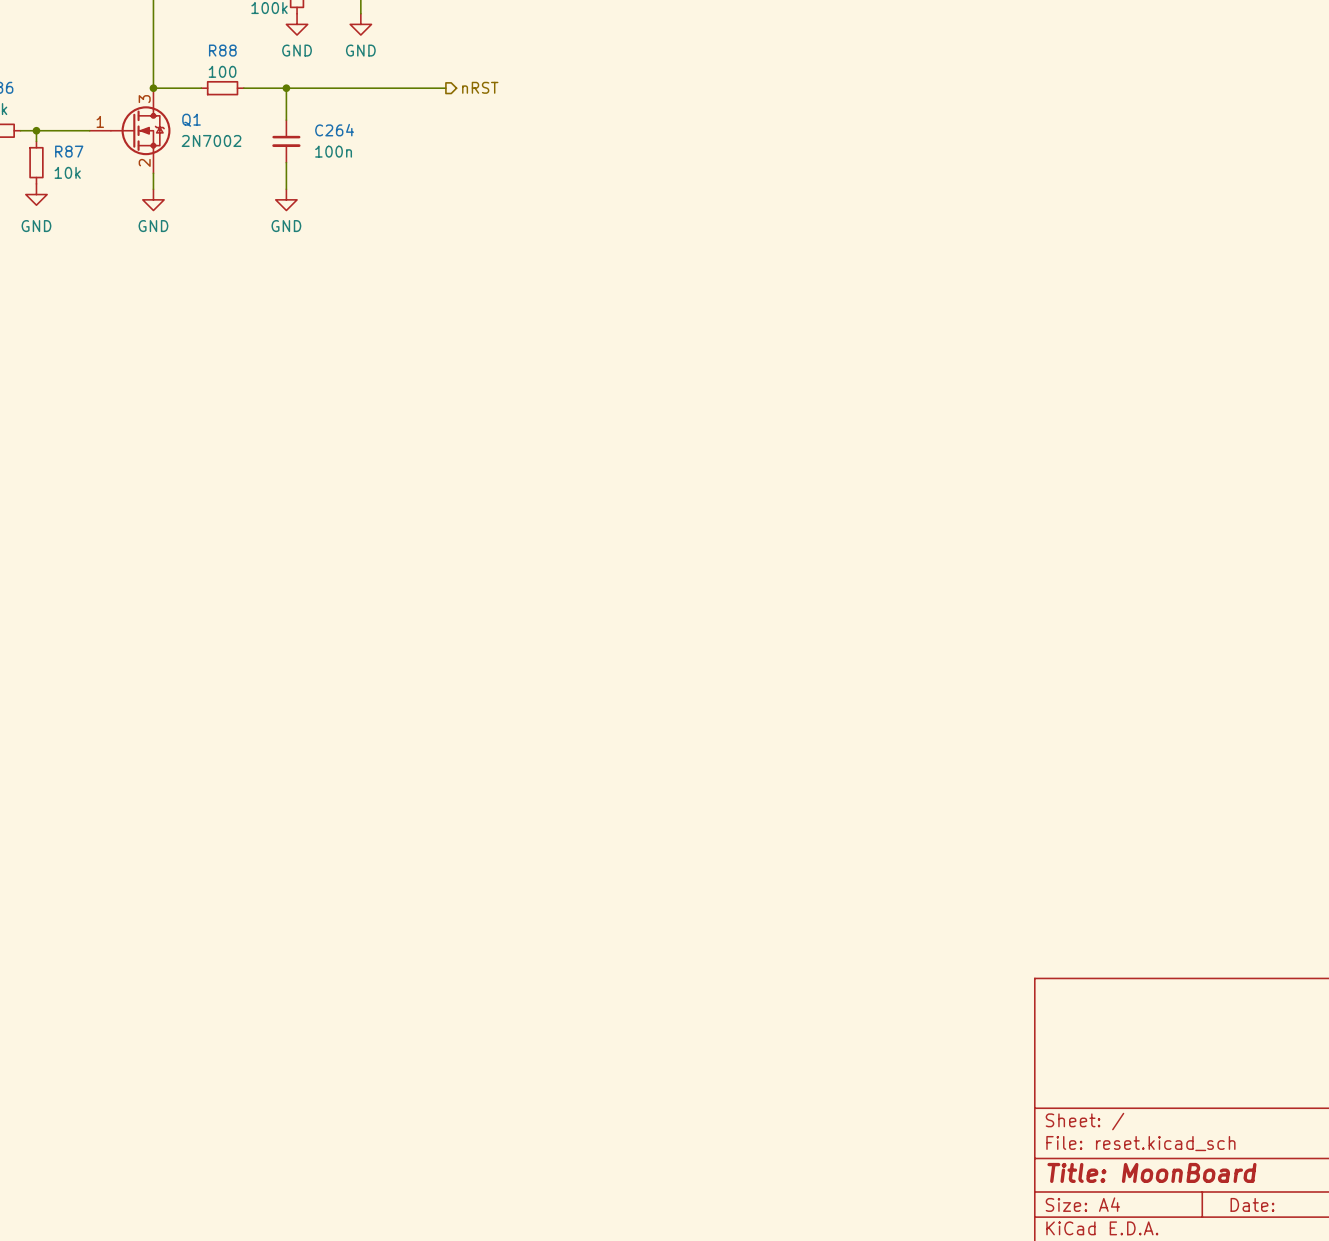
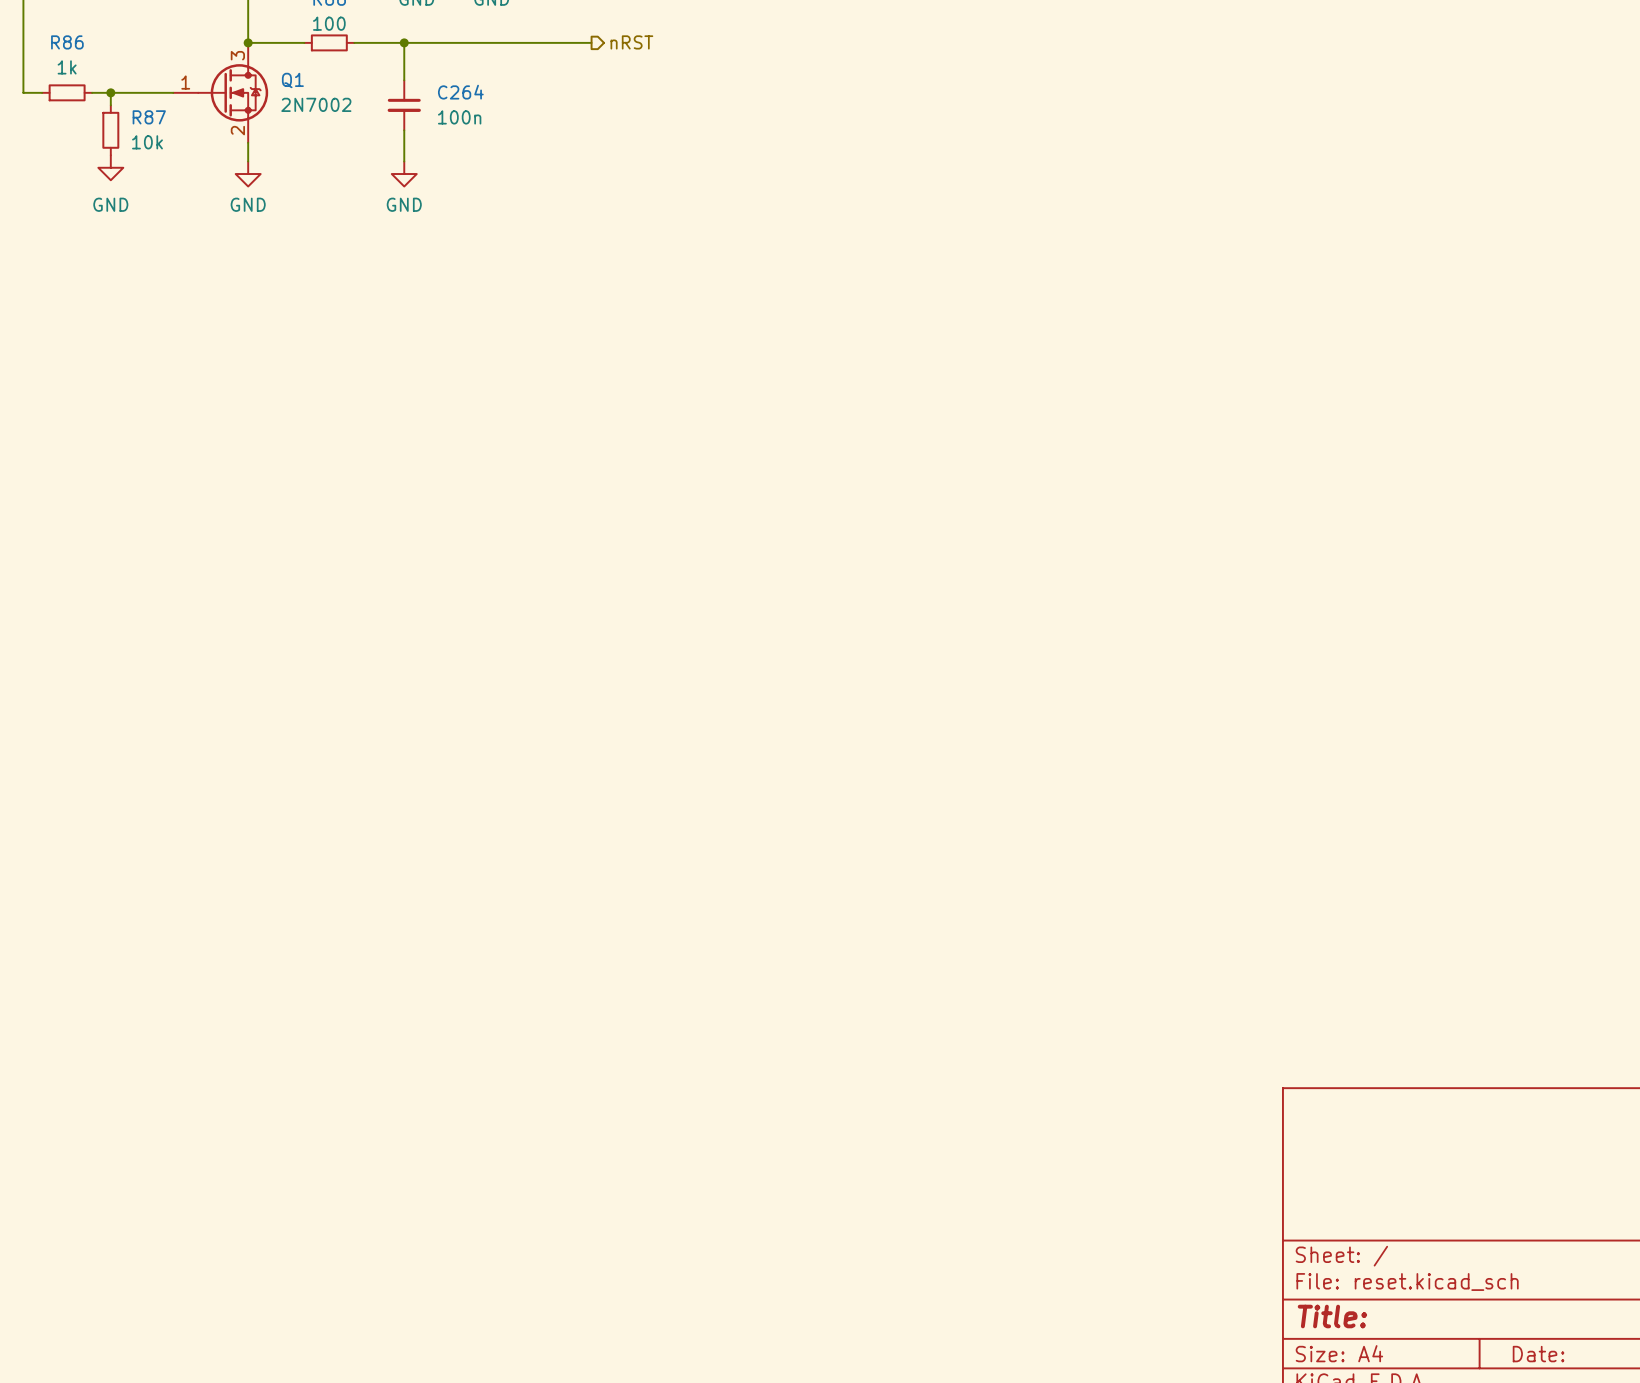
title block: Title: MoonBoard (1151, 1172) -> Title: (1332, 1316)

